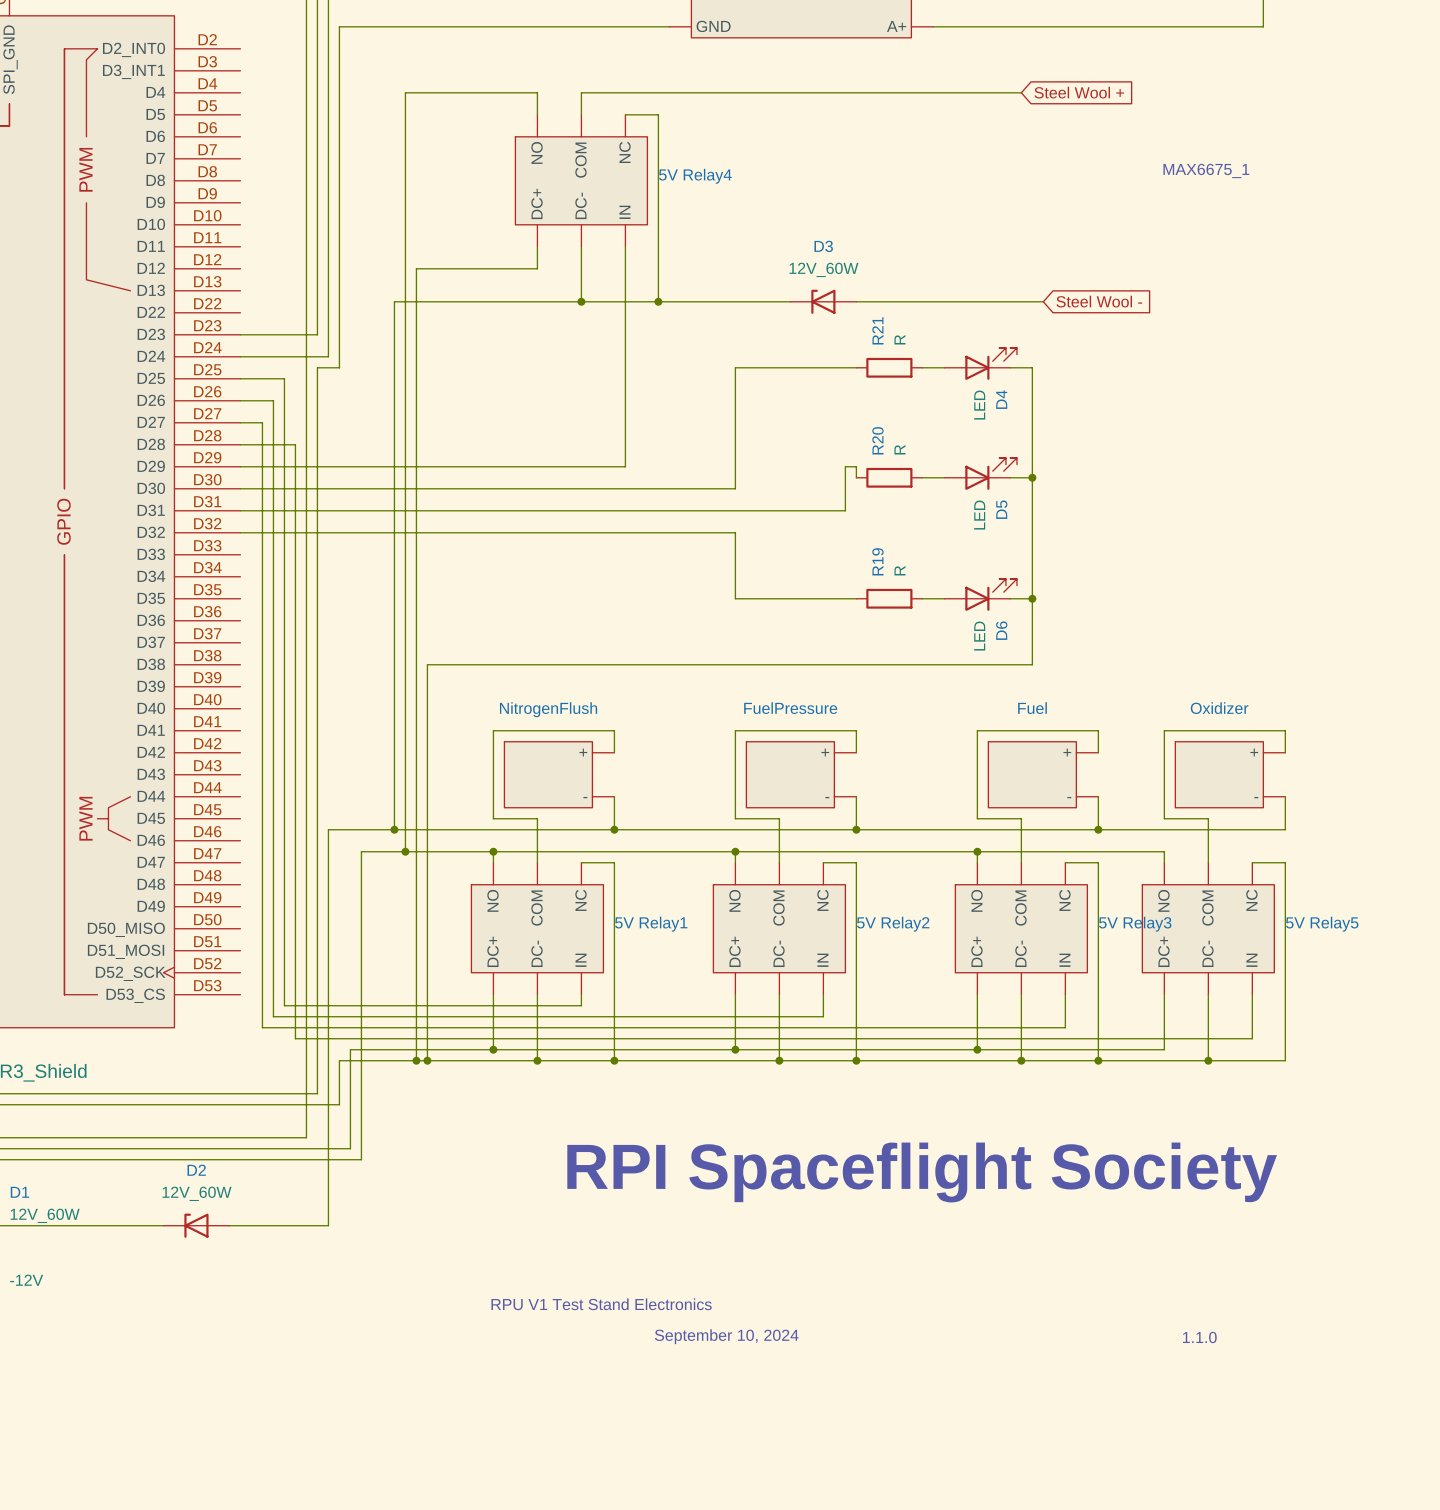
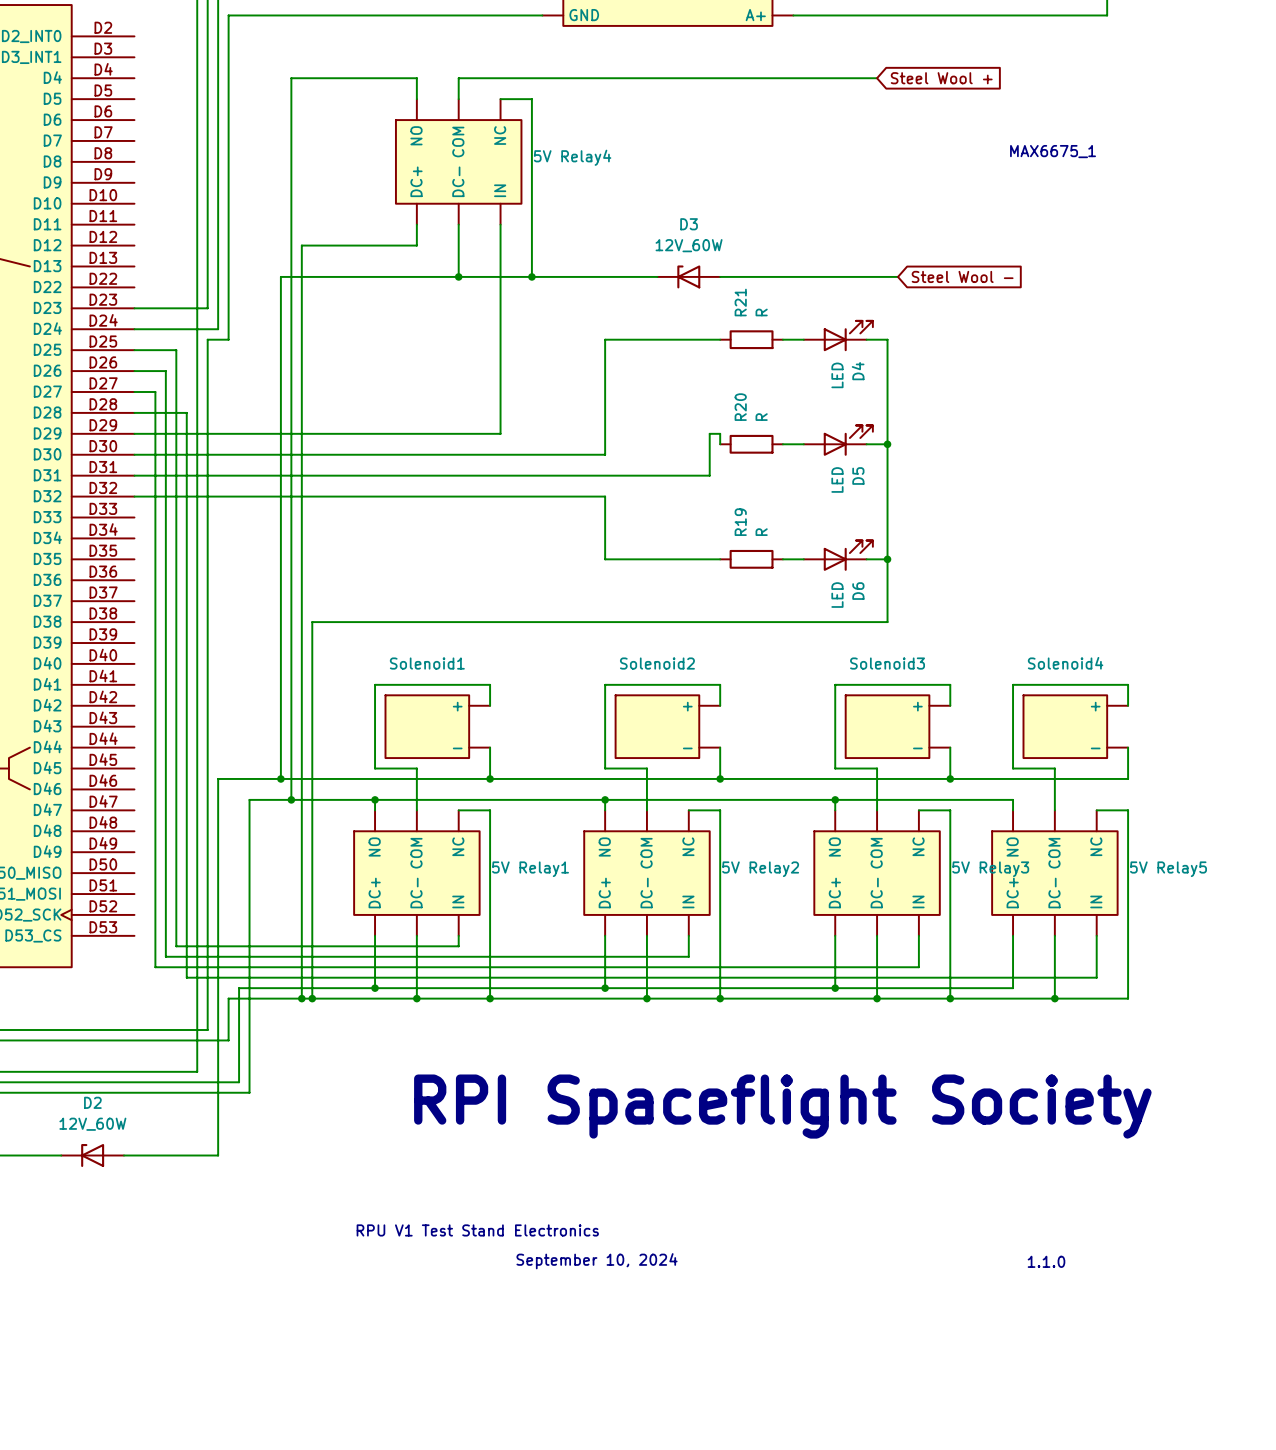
FuelPressure name: FuelPressure (790, 708) -> Solenoid2 (657, 663)
Fuel name: Fuel (1032, 708) -> Solenoid3 (887, 663)
Oxidizer name: Oxidizer (1219, 708) -> Solenoid4 (1065, 663)
NitrogenFlush name: NitrogenFlush (548, 709) -> Solenoid1 (427, 663)

